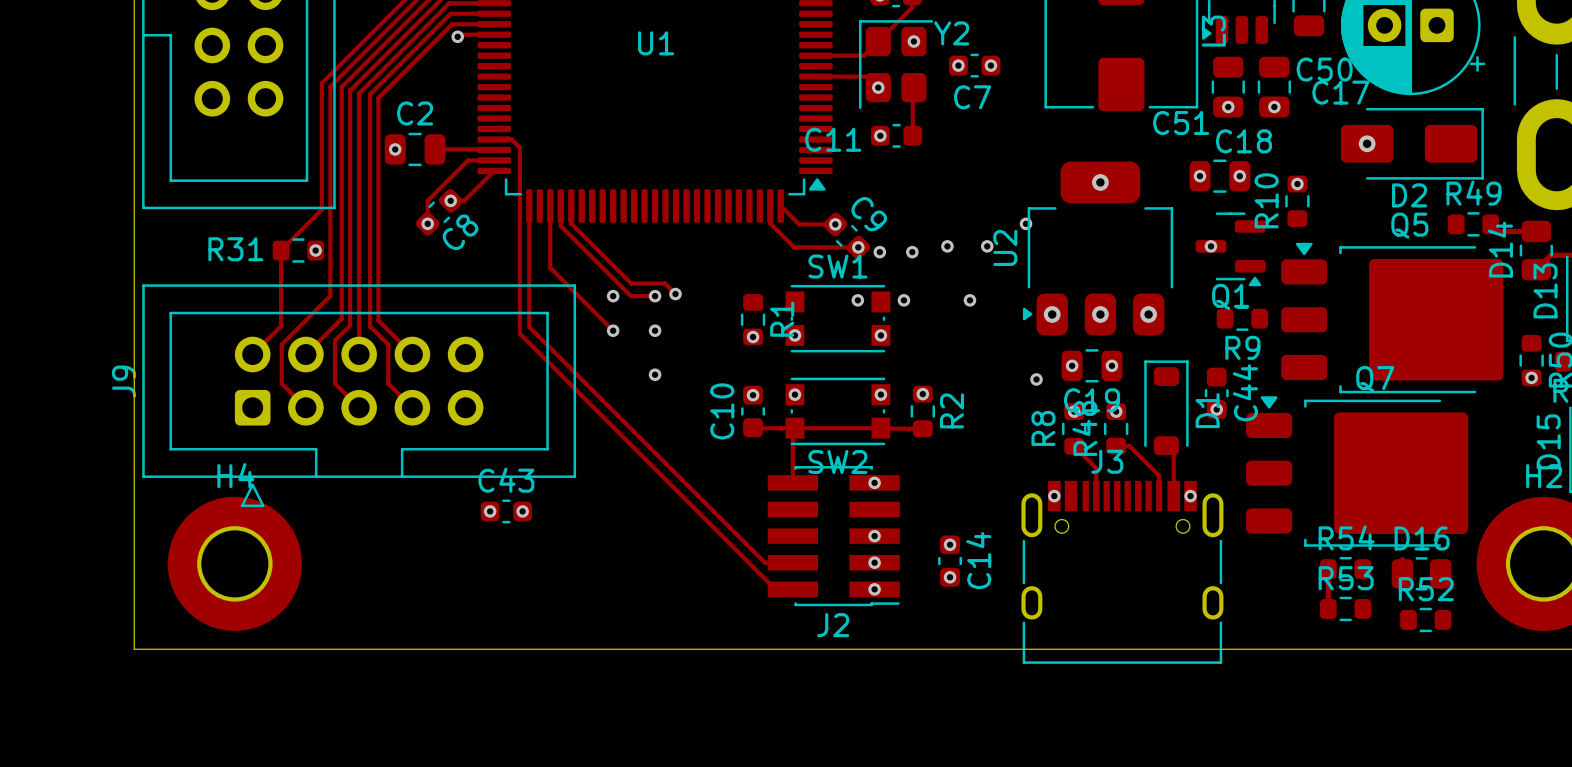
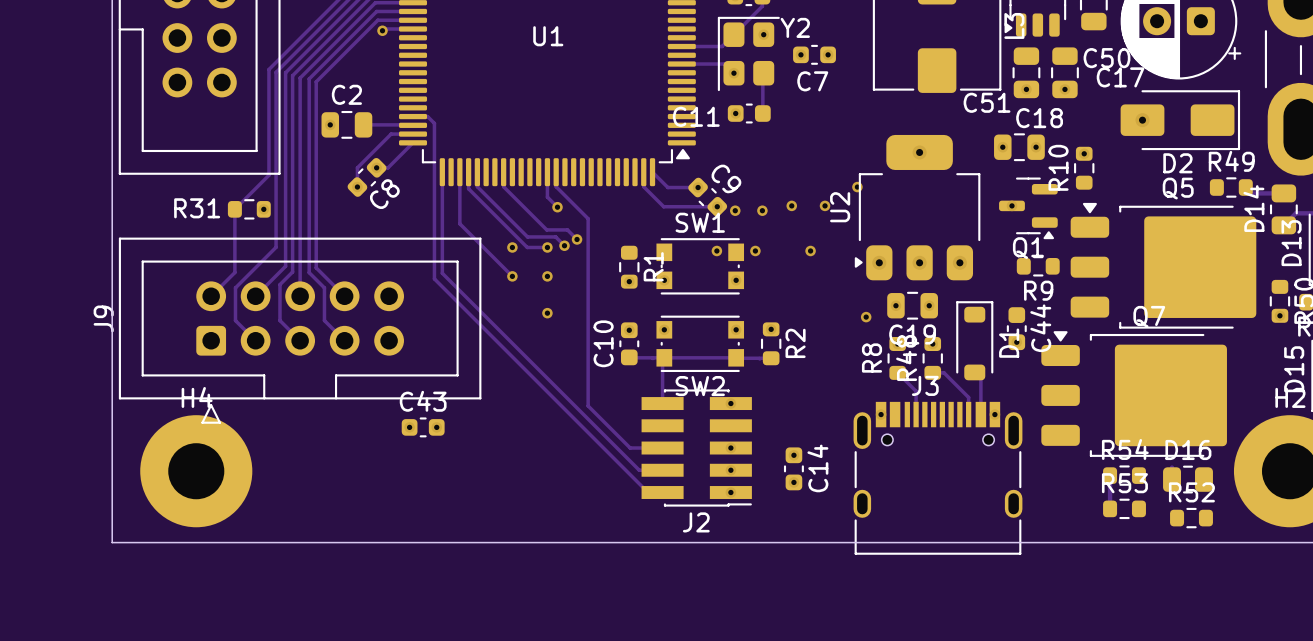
track: none -> (503, 172) (503, 186) (546, 229) (567, 229) (577, 239)
track: none -> (547, 172) (547, 197) (557, 207)
track: none -> (556, 172) (556, 186) (588, 218) (588, 405) (630, 448) (662, 448)
via: none -> (557, 207)
via: none -> (577, 239)

